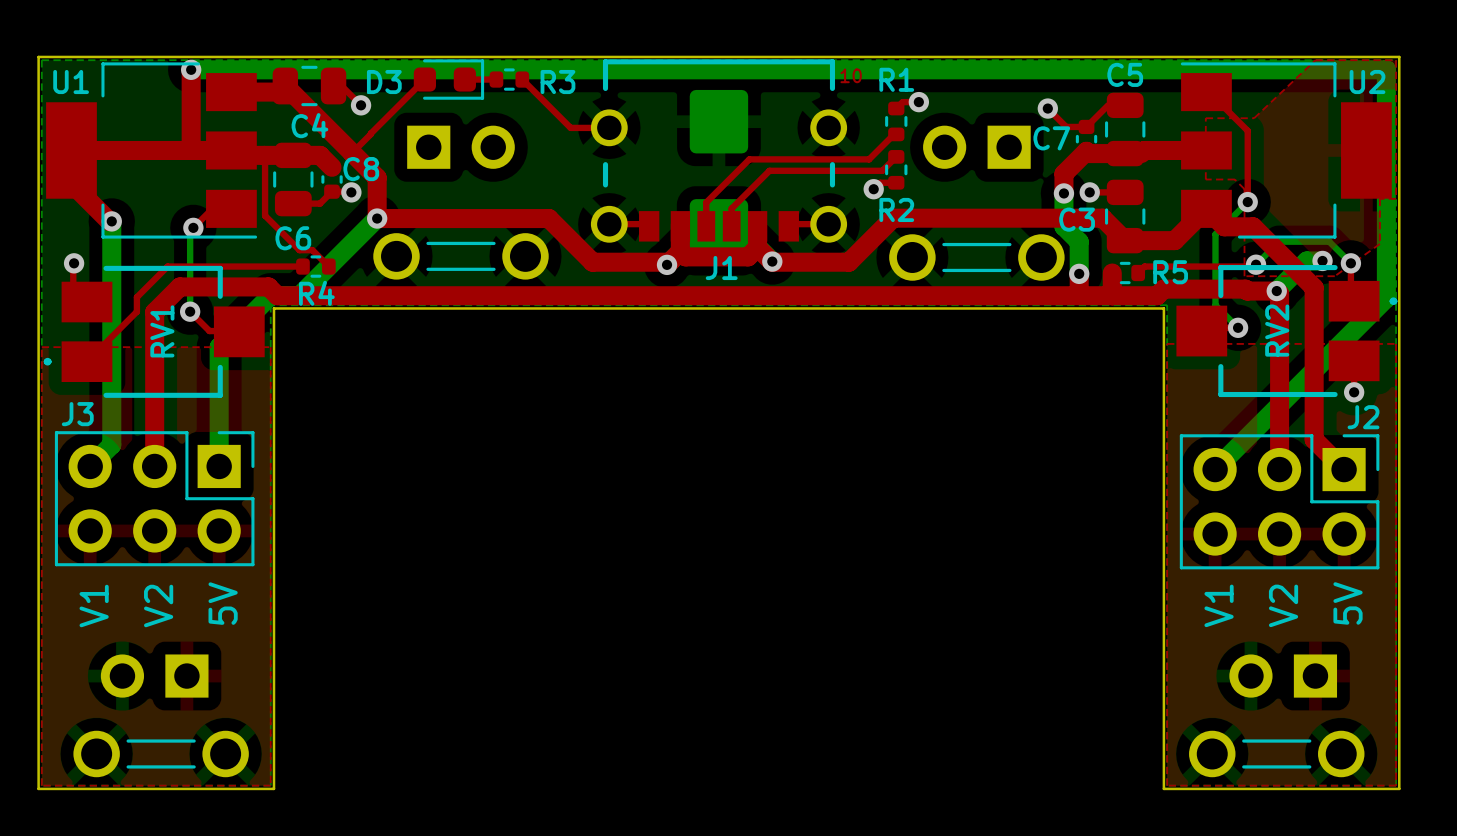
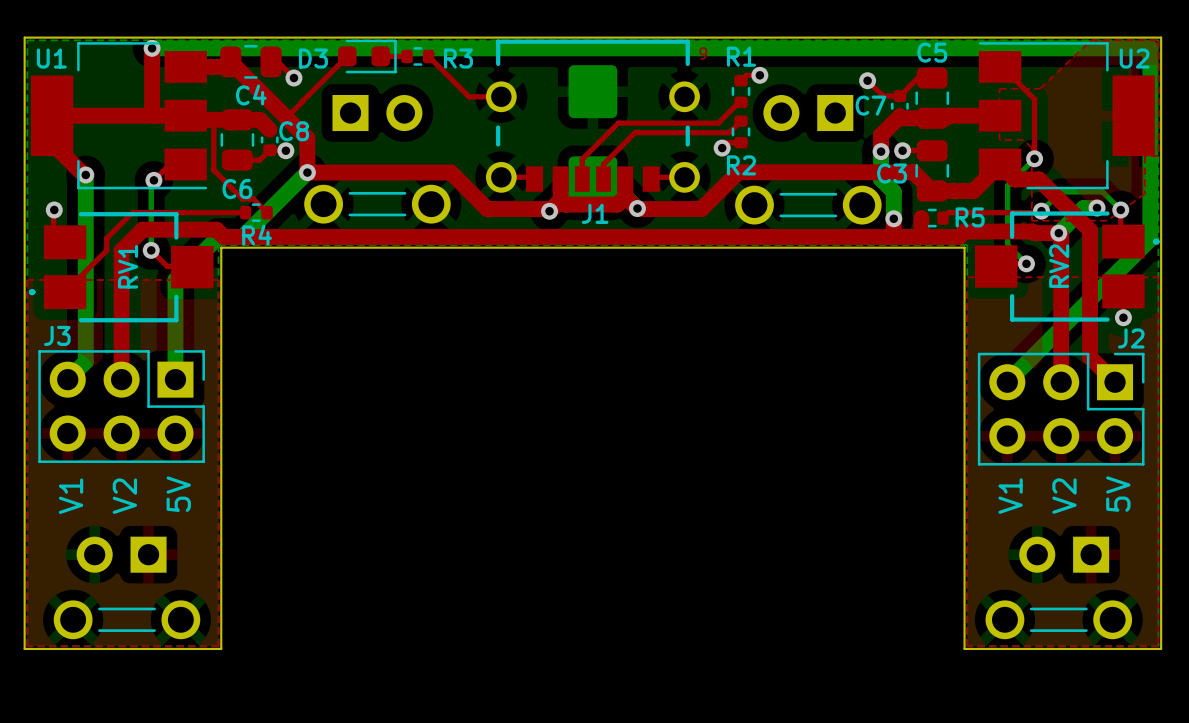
text: 10 (851, 75) -> 9 (703, 53)

